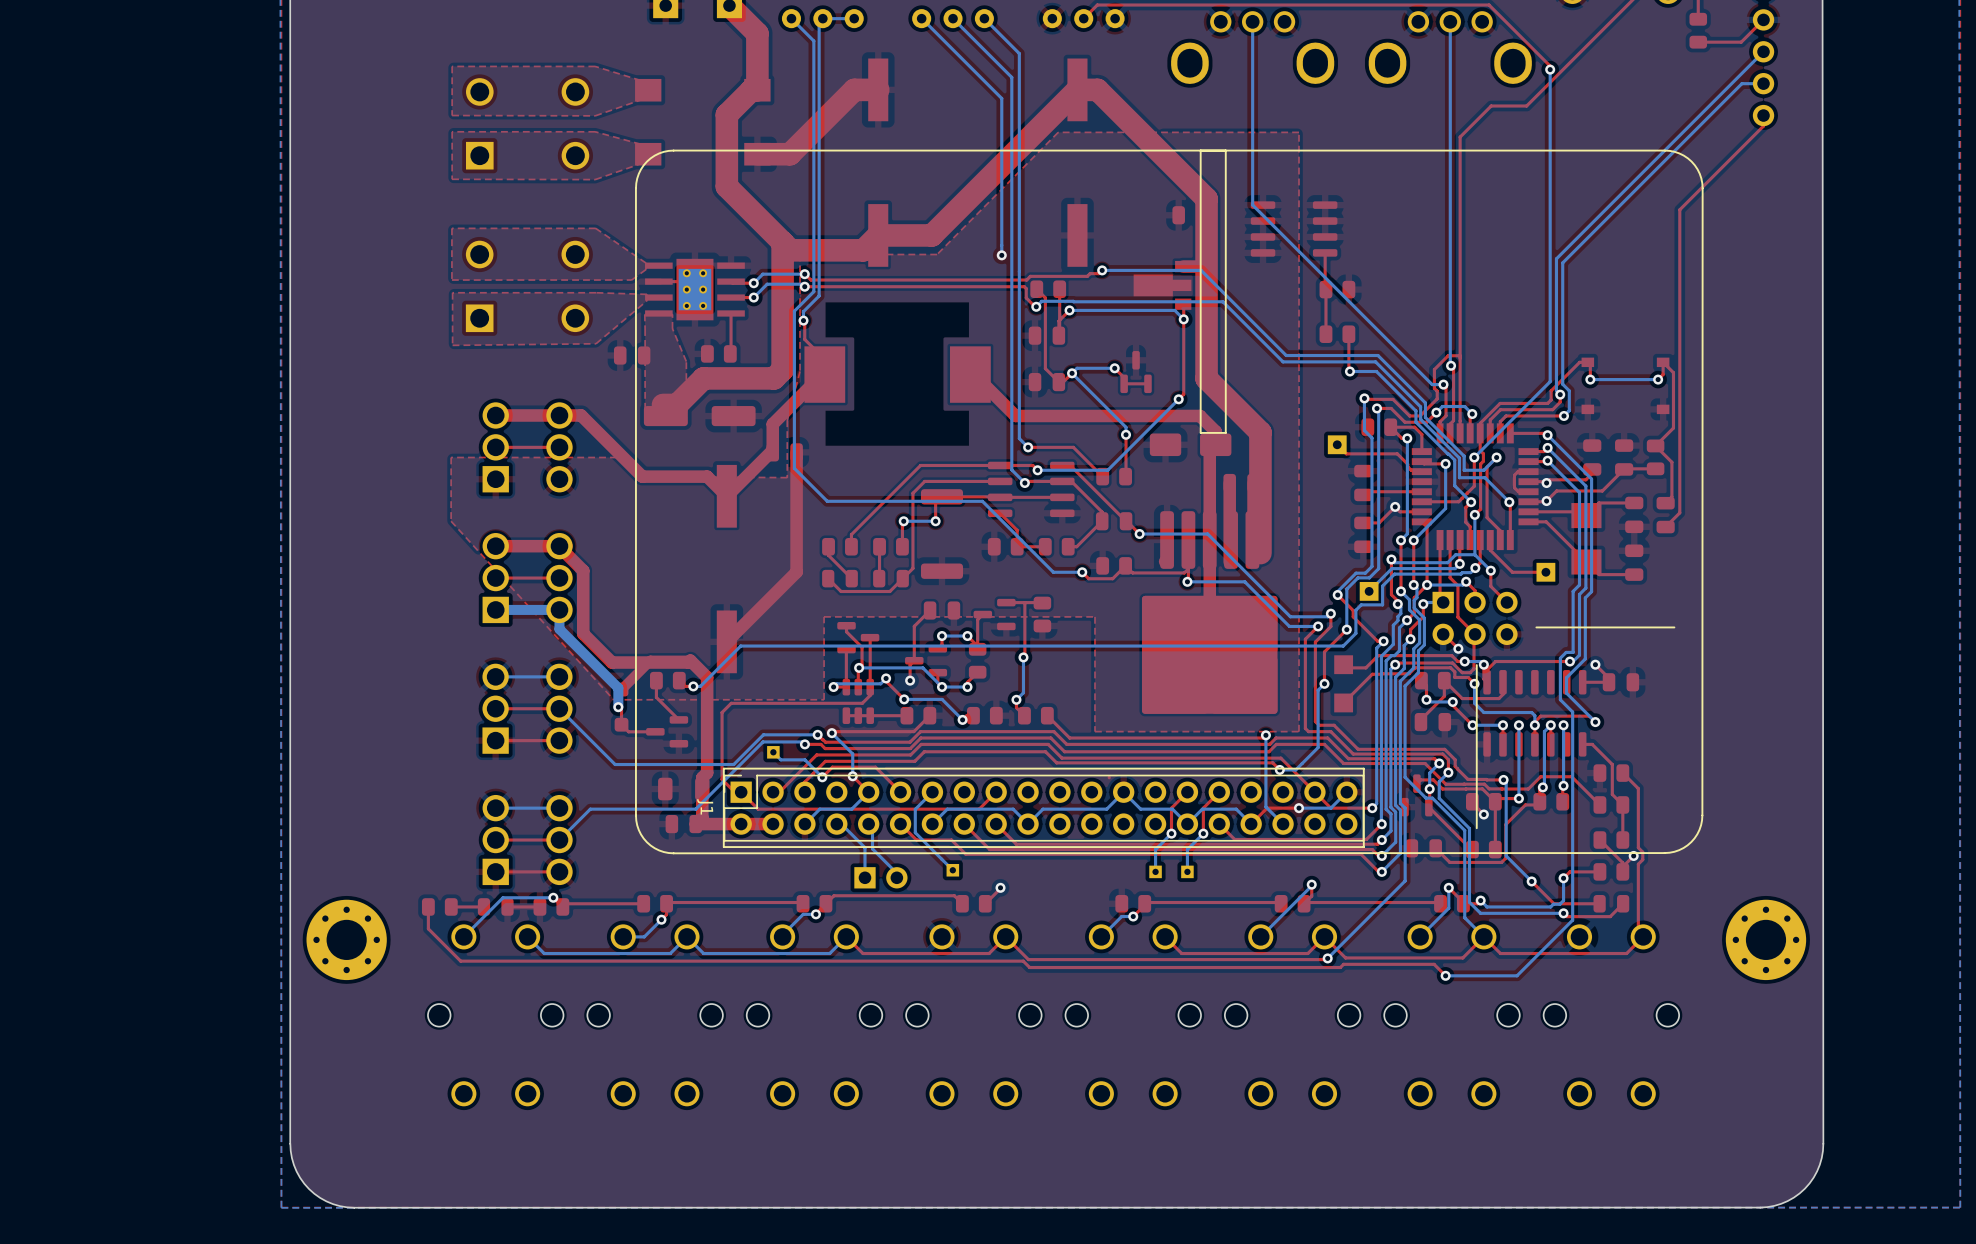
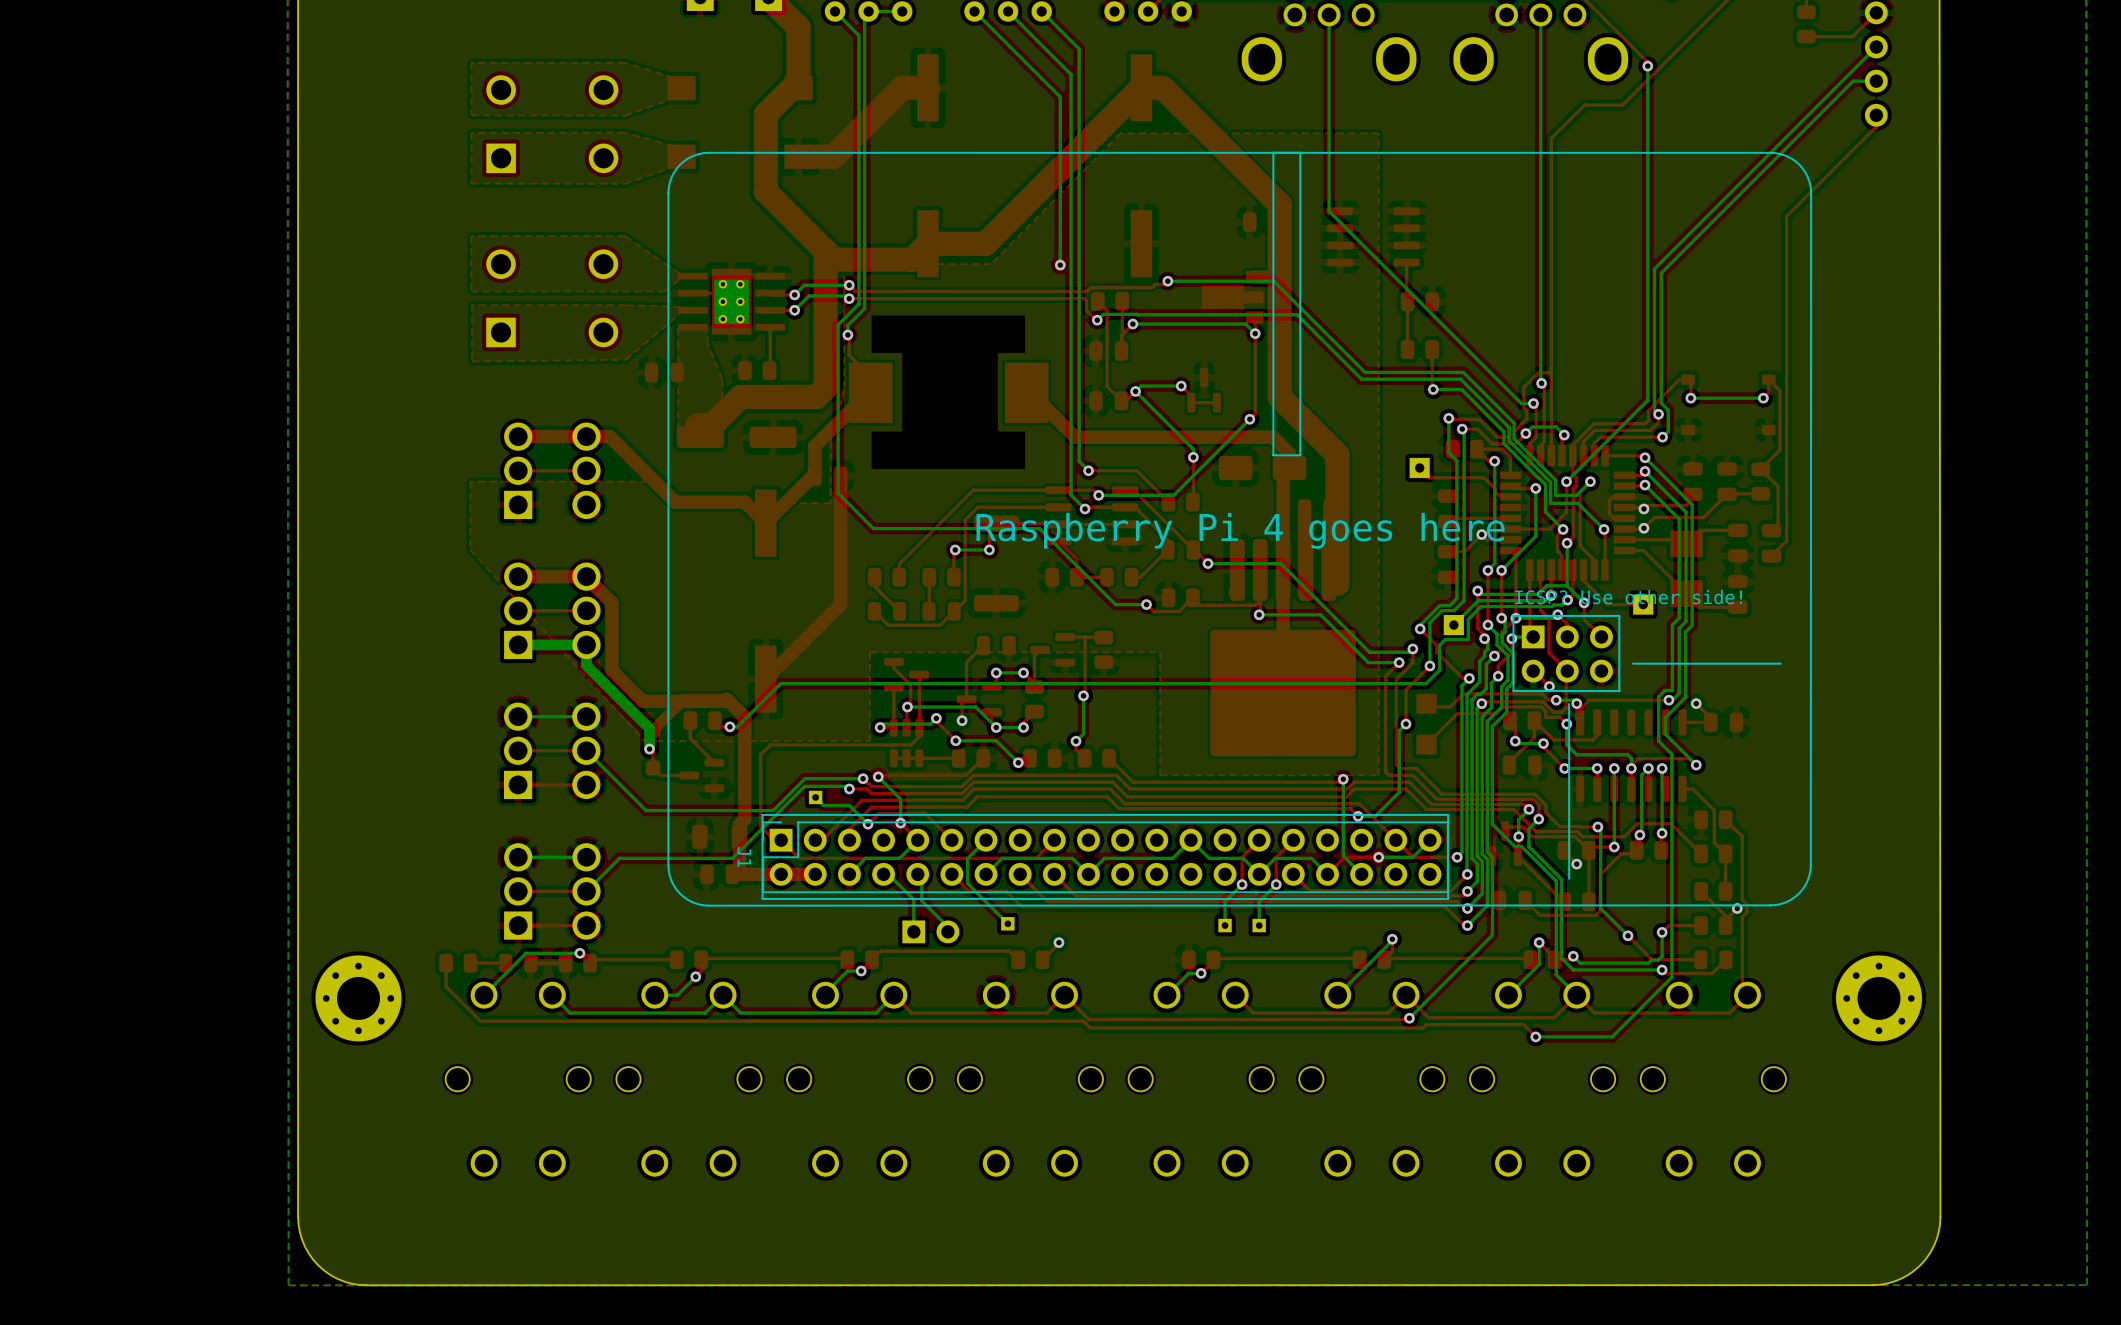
text: none -> Raspberry Pi 4 goes here (1240, 530)
text: none -> ICSP? Use other side! (1628, 597)
line: none -> (1619, 615) (1513, 615) (1513, 691) (1619, 691) (1619, 615)

